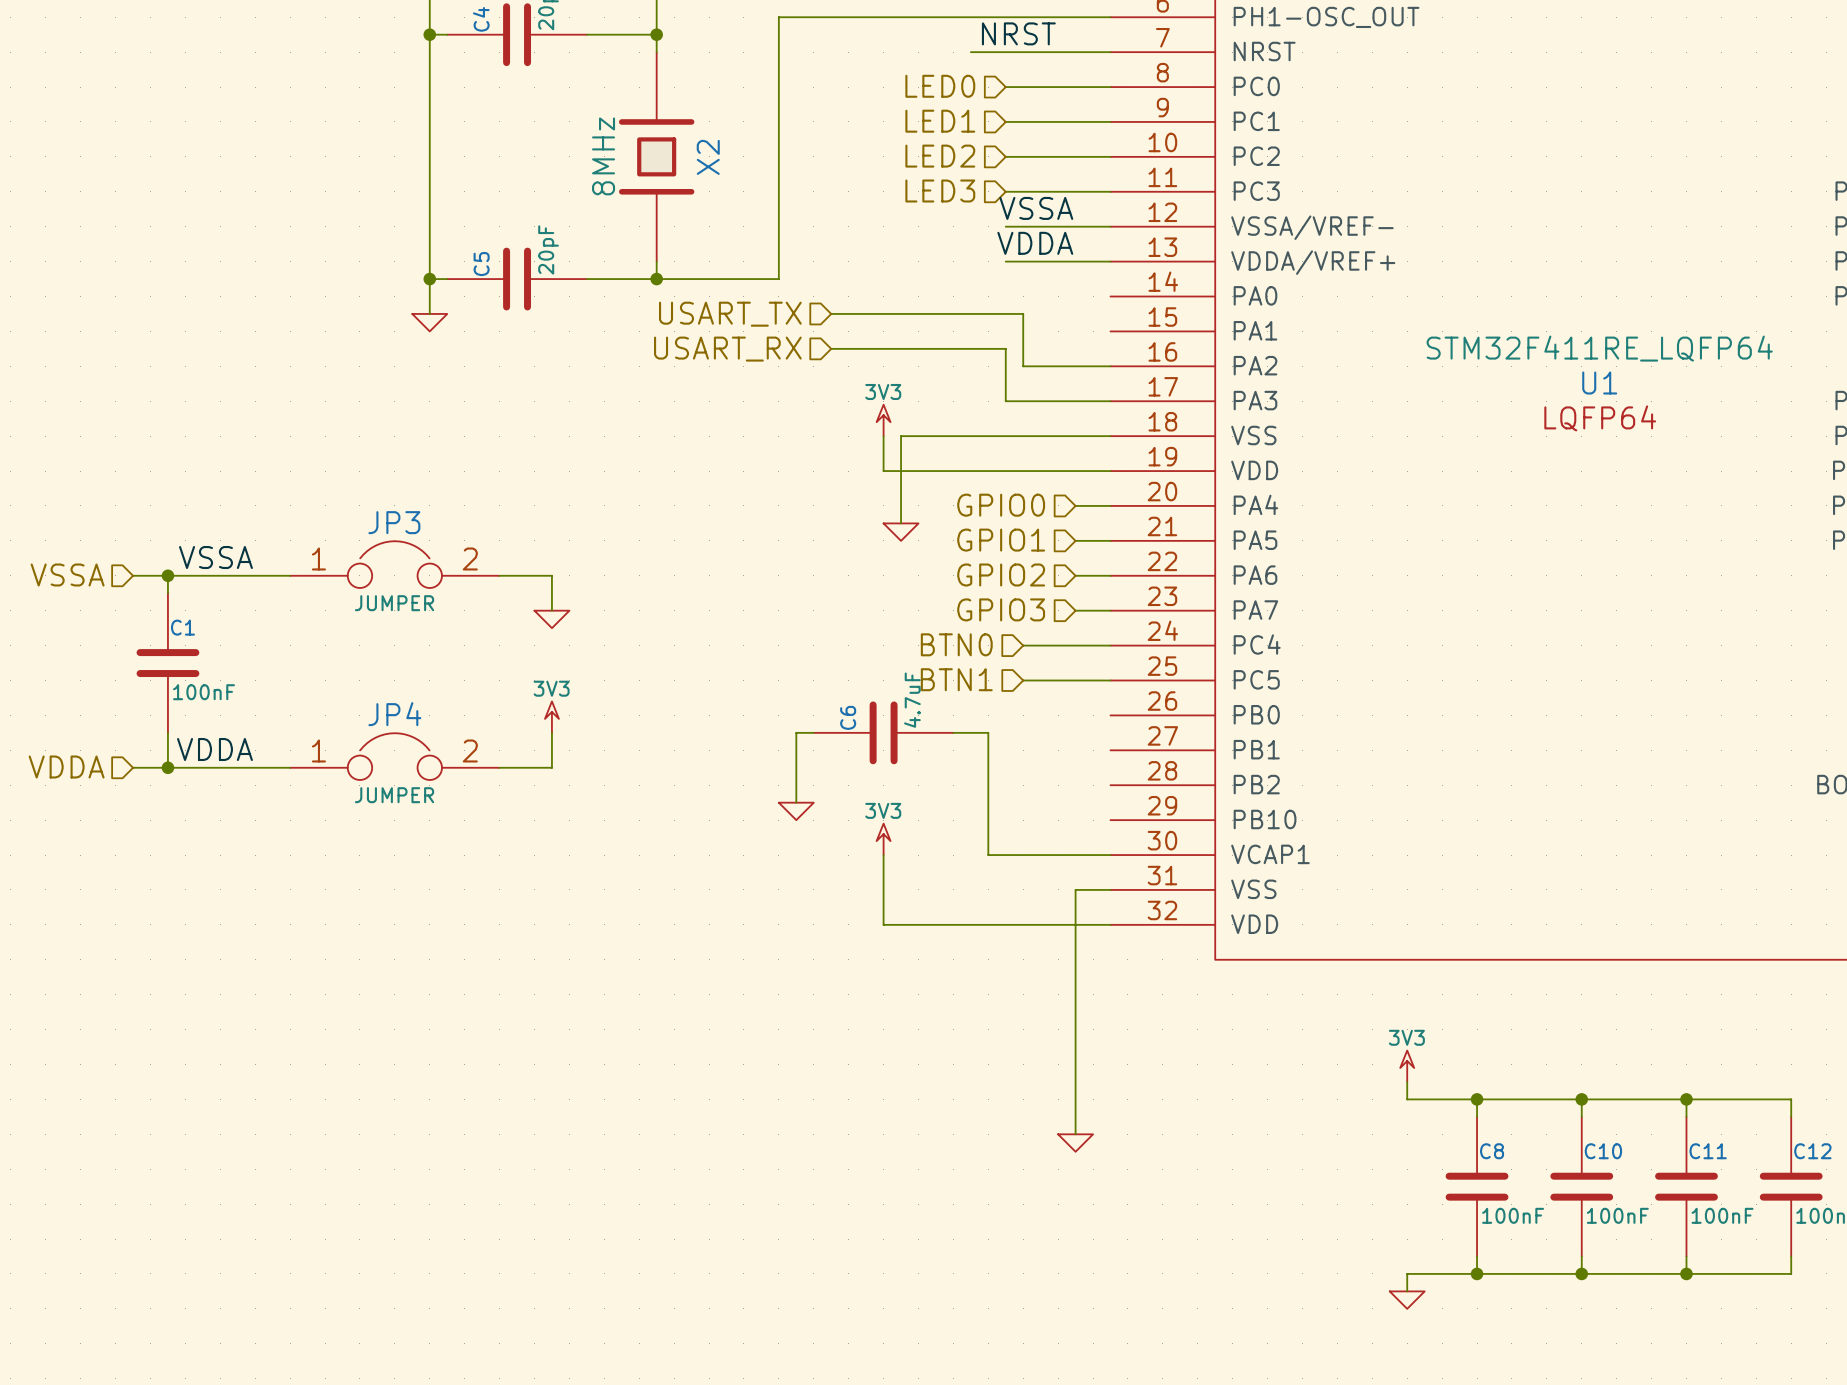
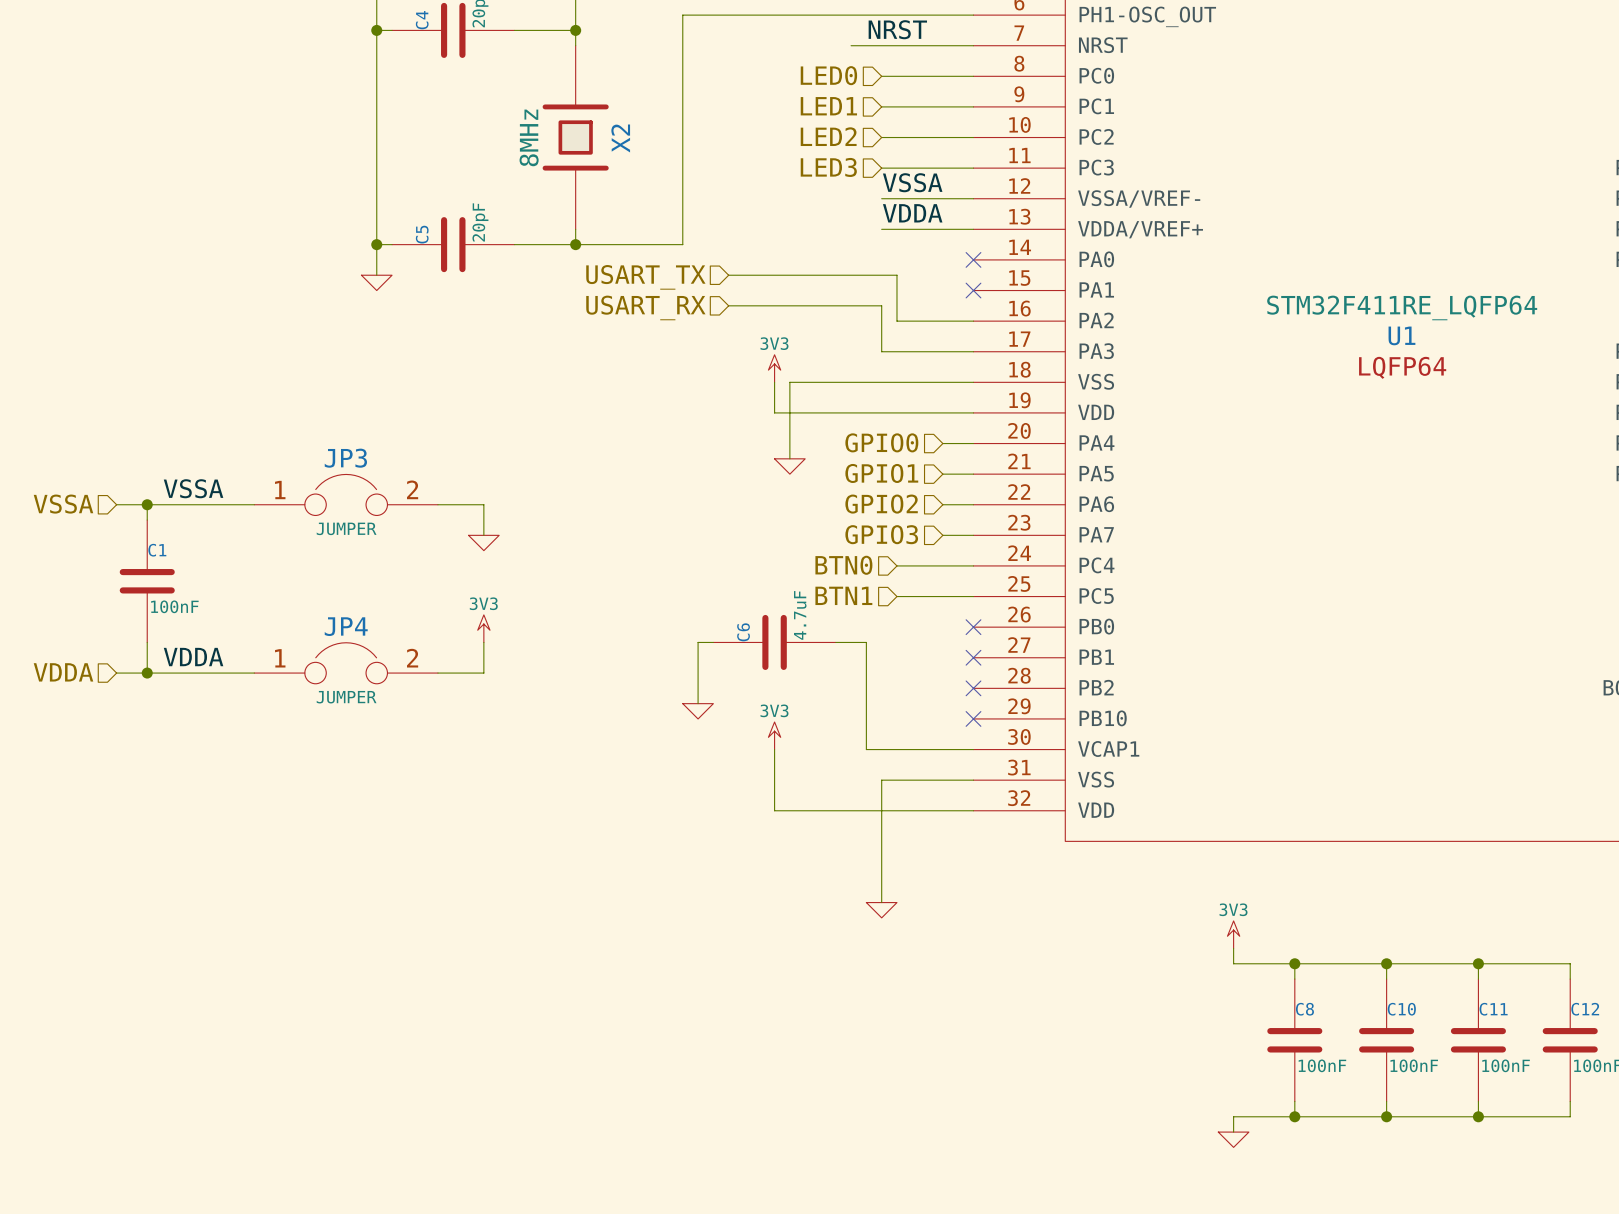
no-connect mark: none -> (973, 259)
no-connect mark: none -> (973, 290)
no-connect mark: none -> (973, 627)
no-connect mark: none -> (973, 657)
no-connect mark: none -> (973, 688)
no-connect mark: none -> (973, 718)
wire: (1075, 889) (1075, 1134) -> (942, 780) (881, 780) (881, 902)
power symbol position: (1075, 1143) -> (881, 910)

